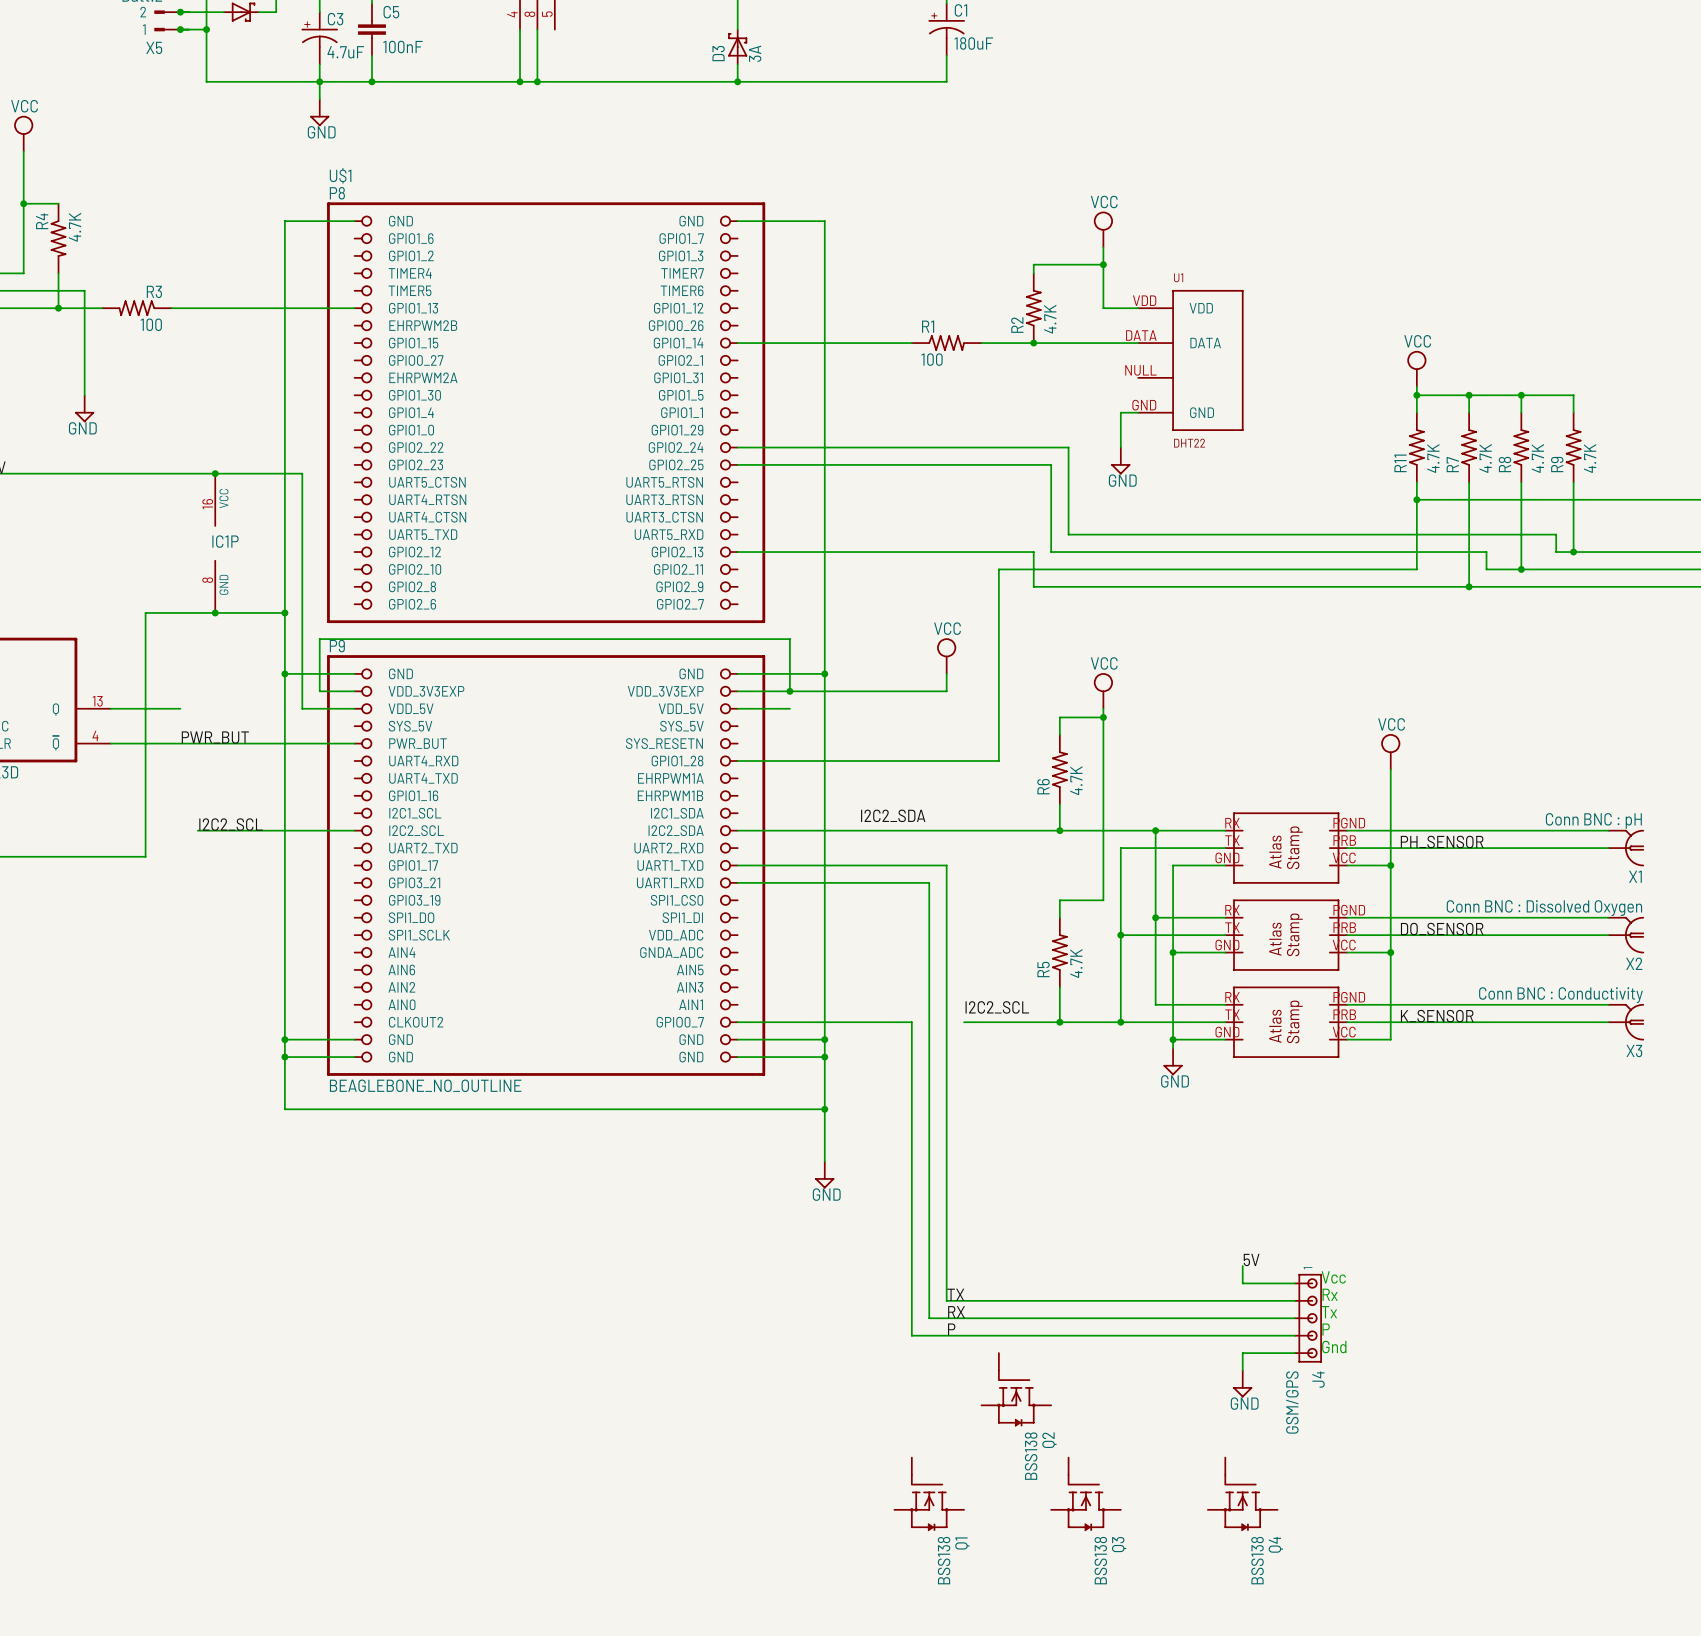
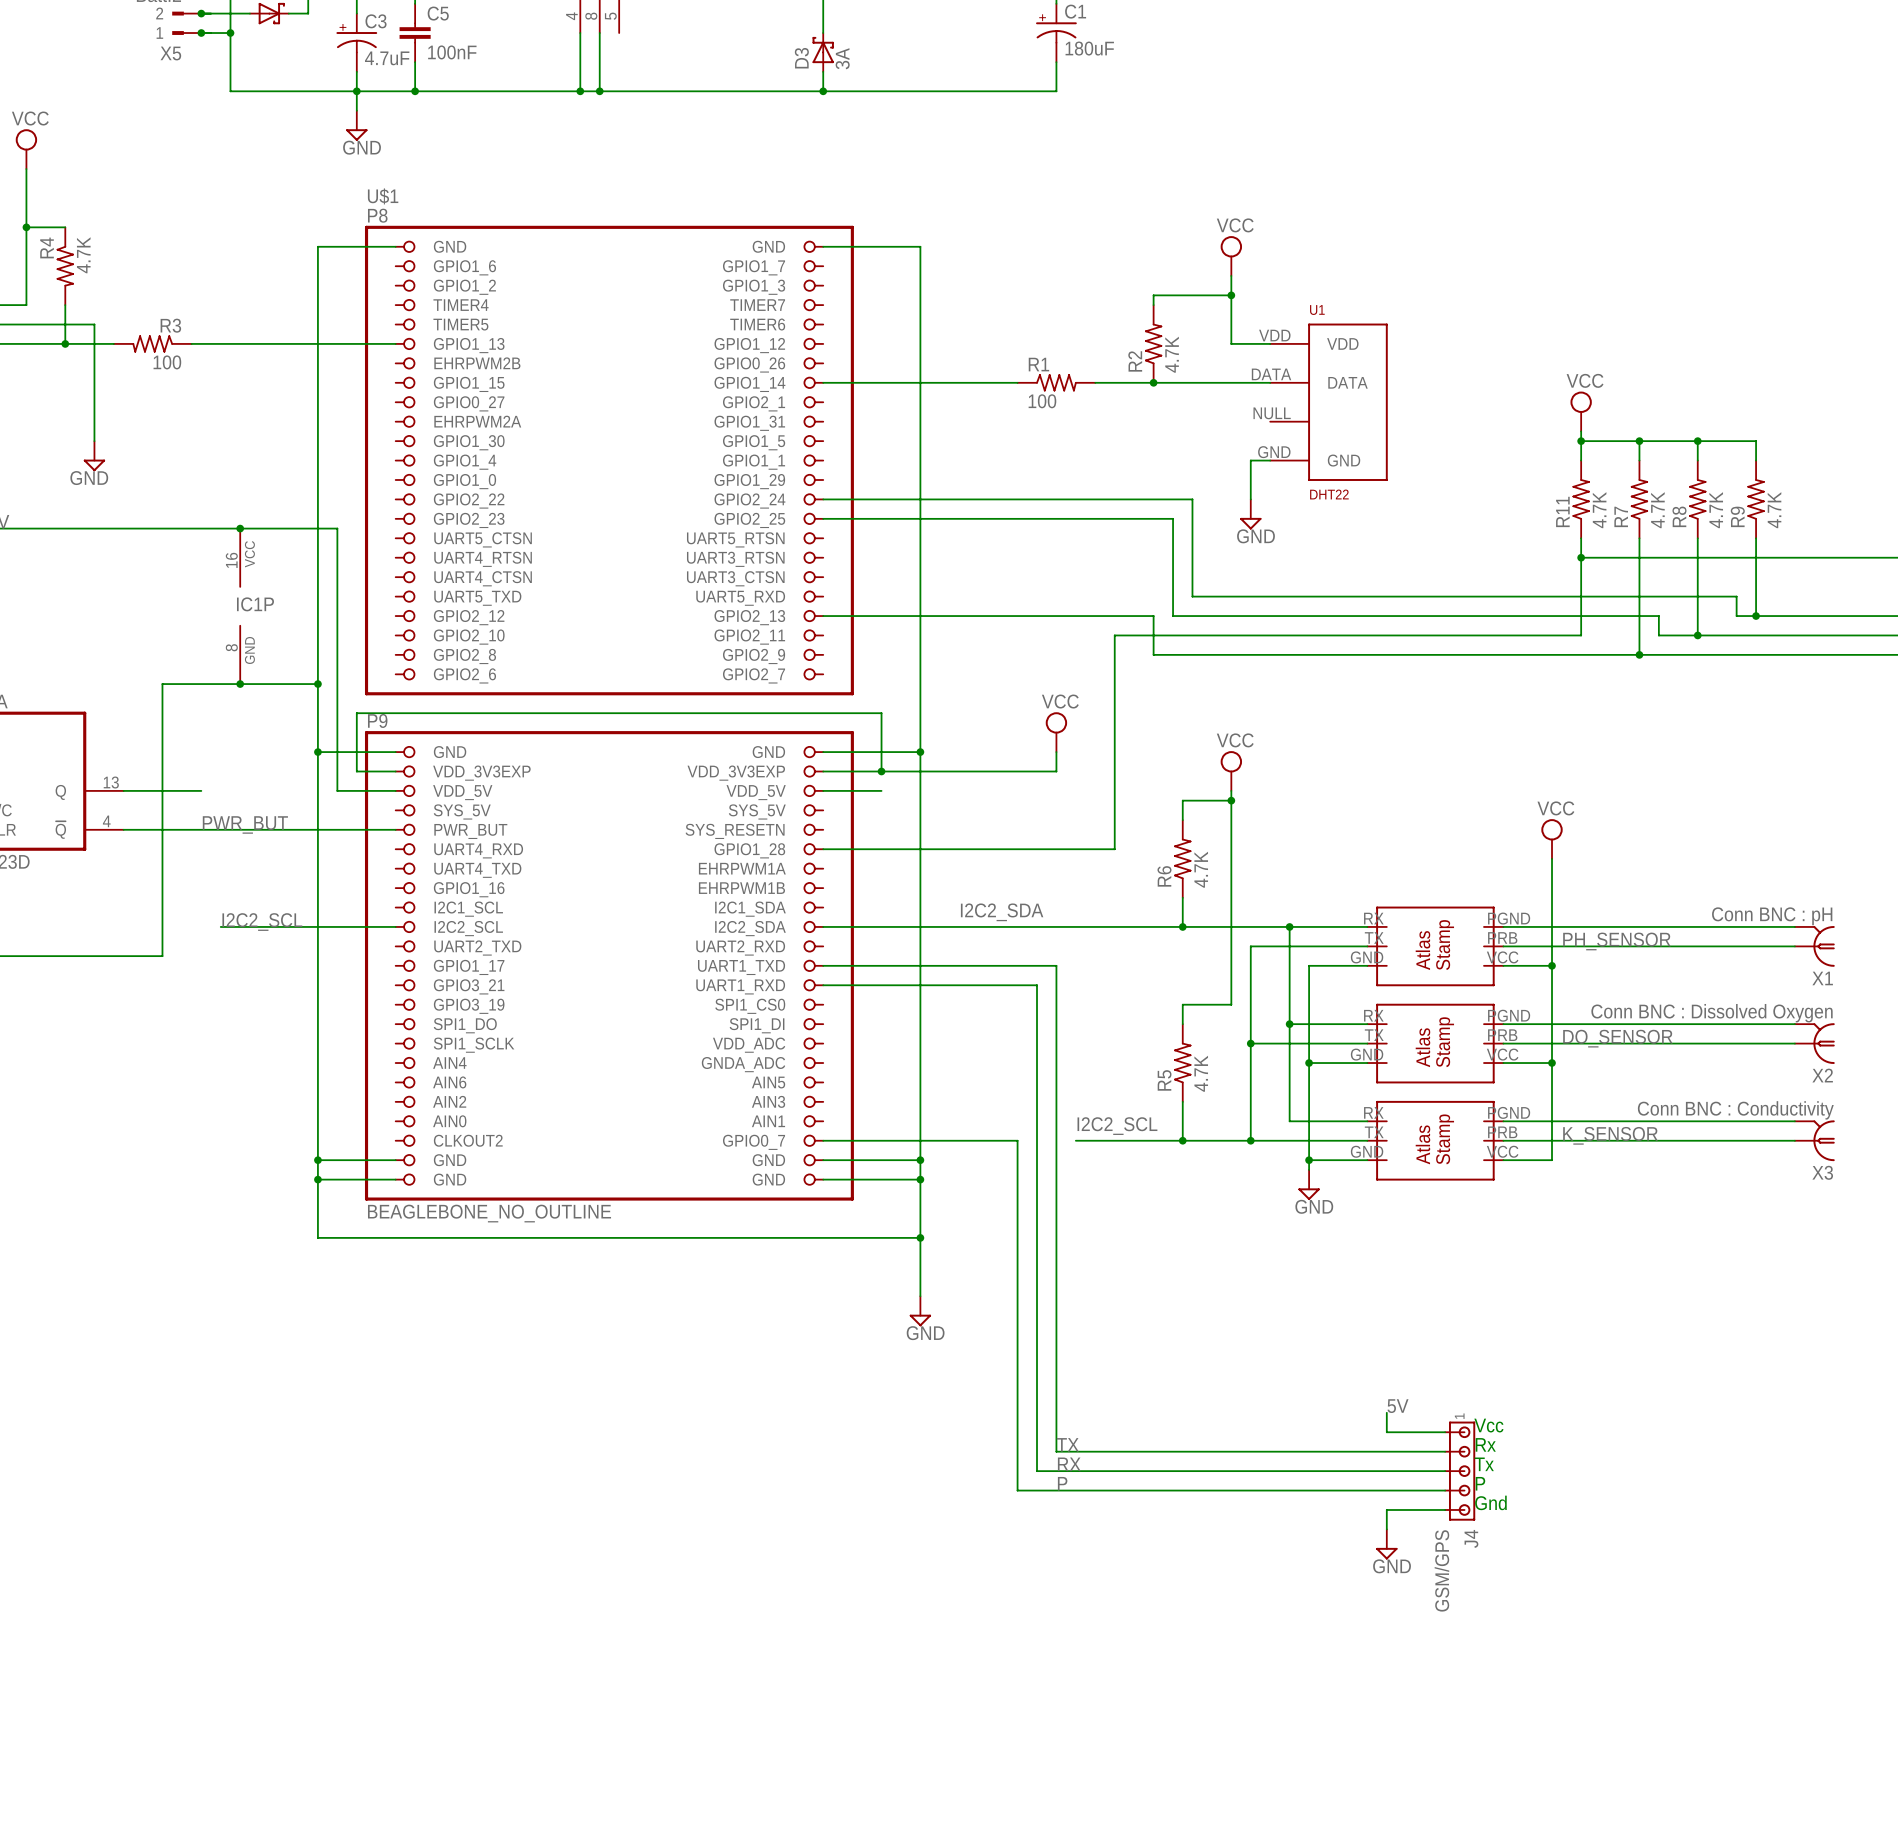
Q2: BSS138 (1016, 1389) -> none
Q1: BSS138 (929, 1494) -> none
Q3: BSS138 (1085, 1494) -> none
Q4: BSS138 (1242, 1494) -> none

